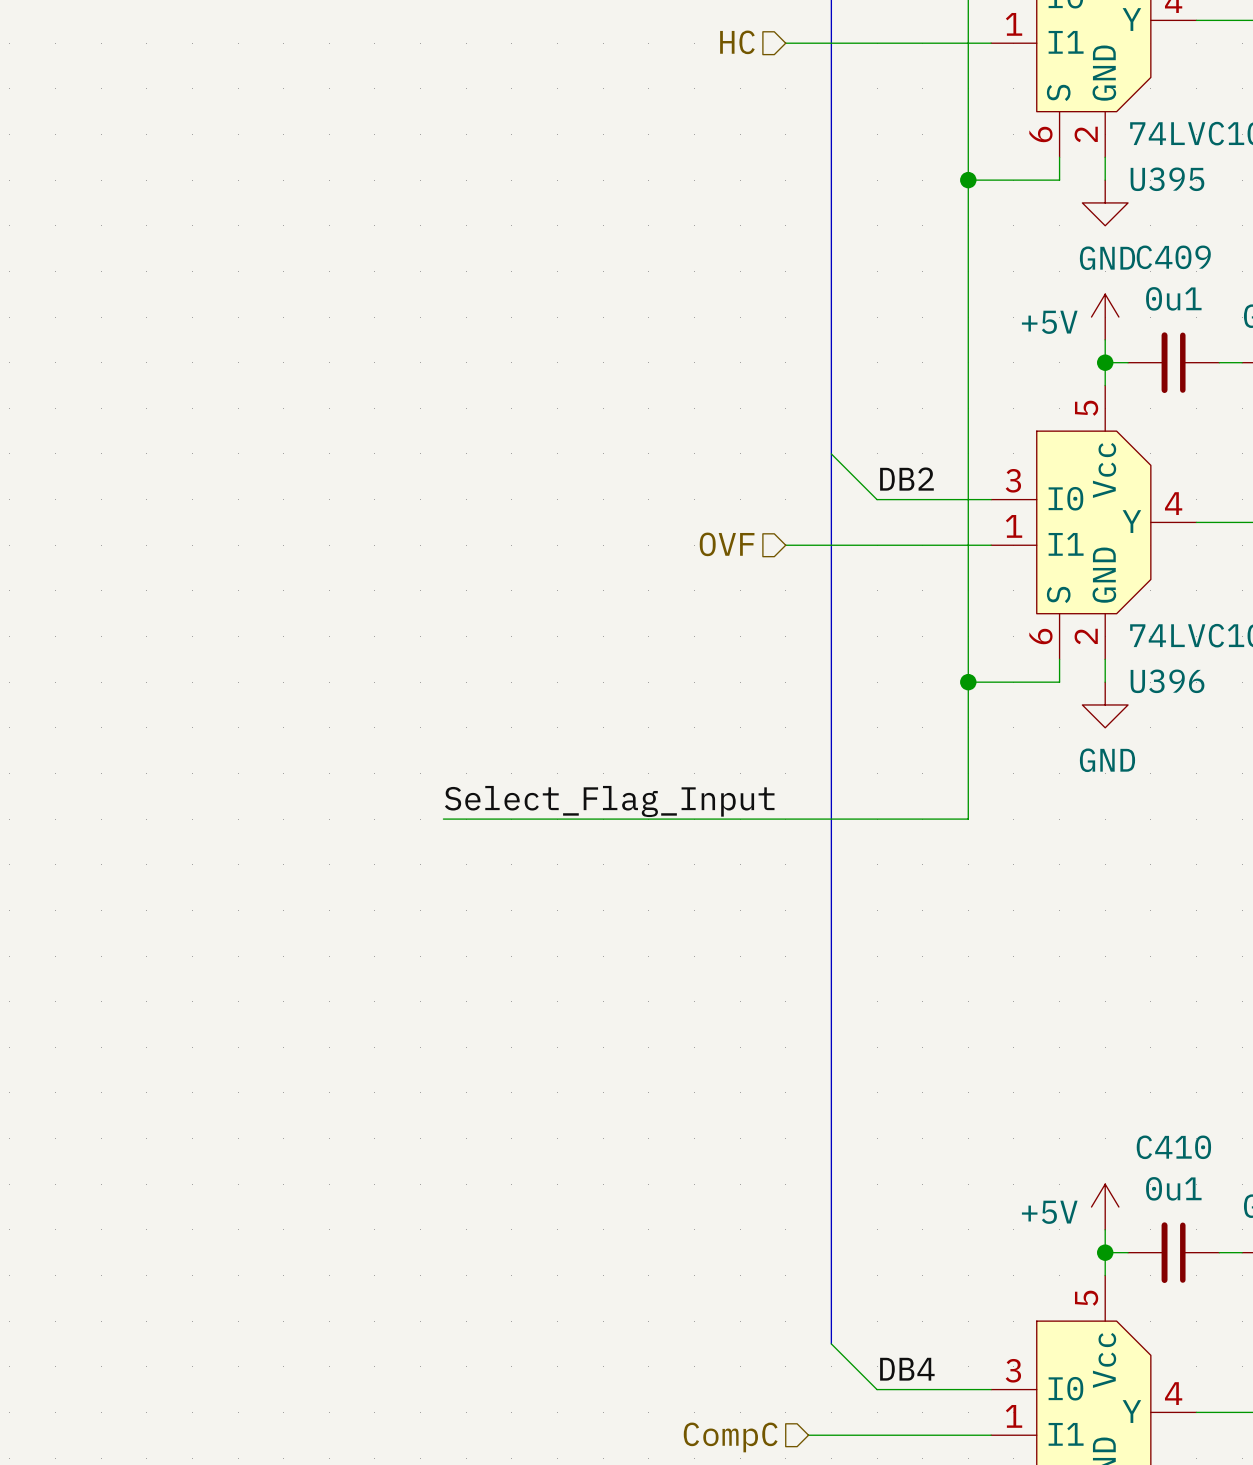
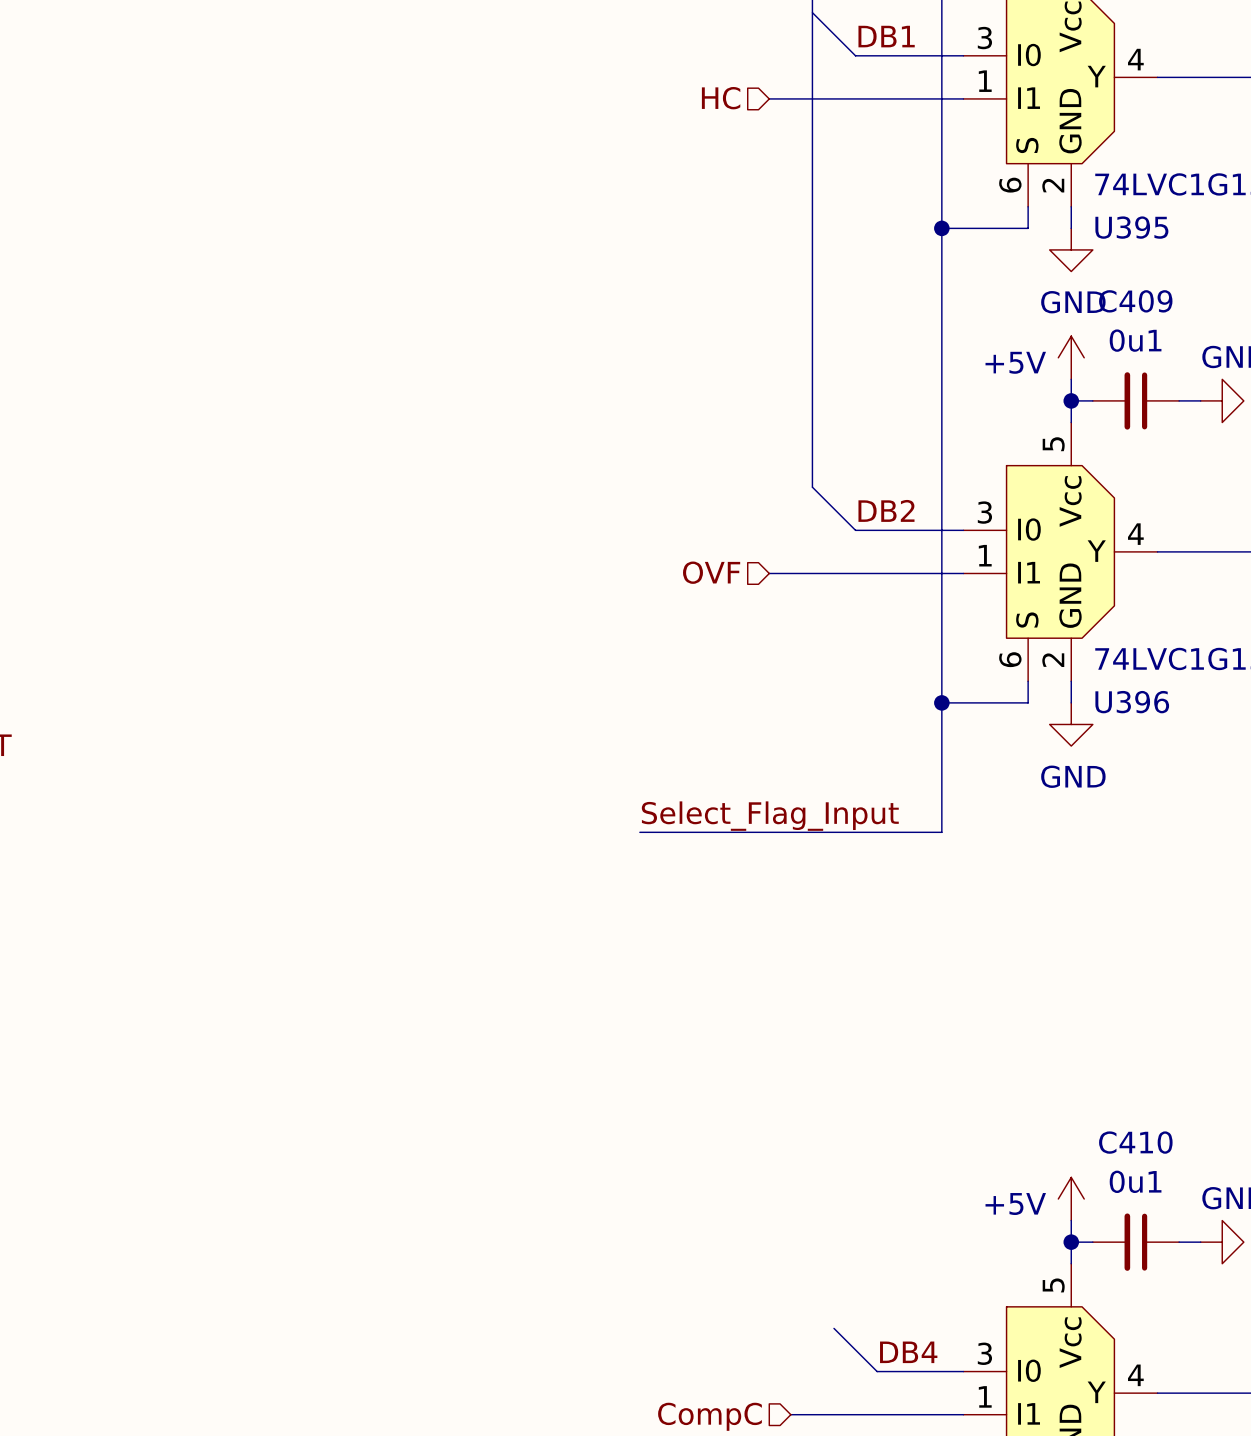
bus: (831, 453) (831, 1343) -> none
label position: Select_Flag_Input (609, 801) -> Select_Flag_Input (770, 816)
wire: (443, 819) (648, 819) -> none
wire: (831, 1343) (877, 1389) (899, 1389) -> (834, 1328) (877, 1371)
label position: DB4 (907, 1369) -> DB4 (908, 1352)

